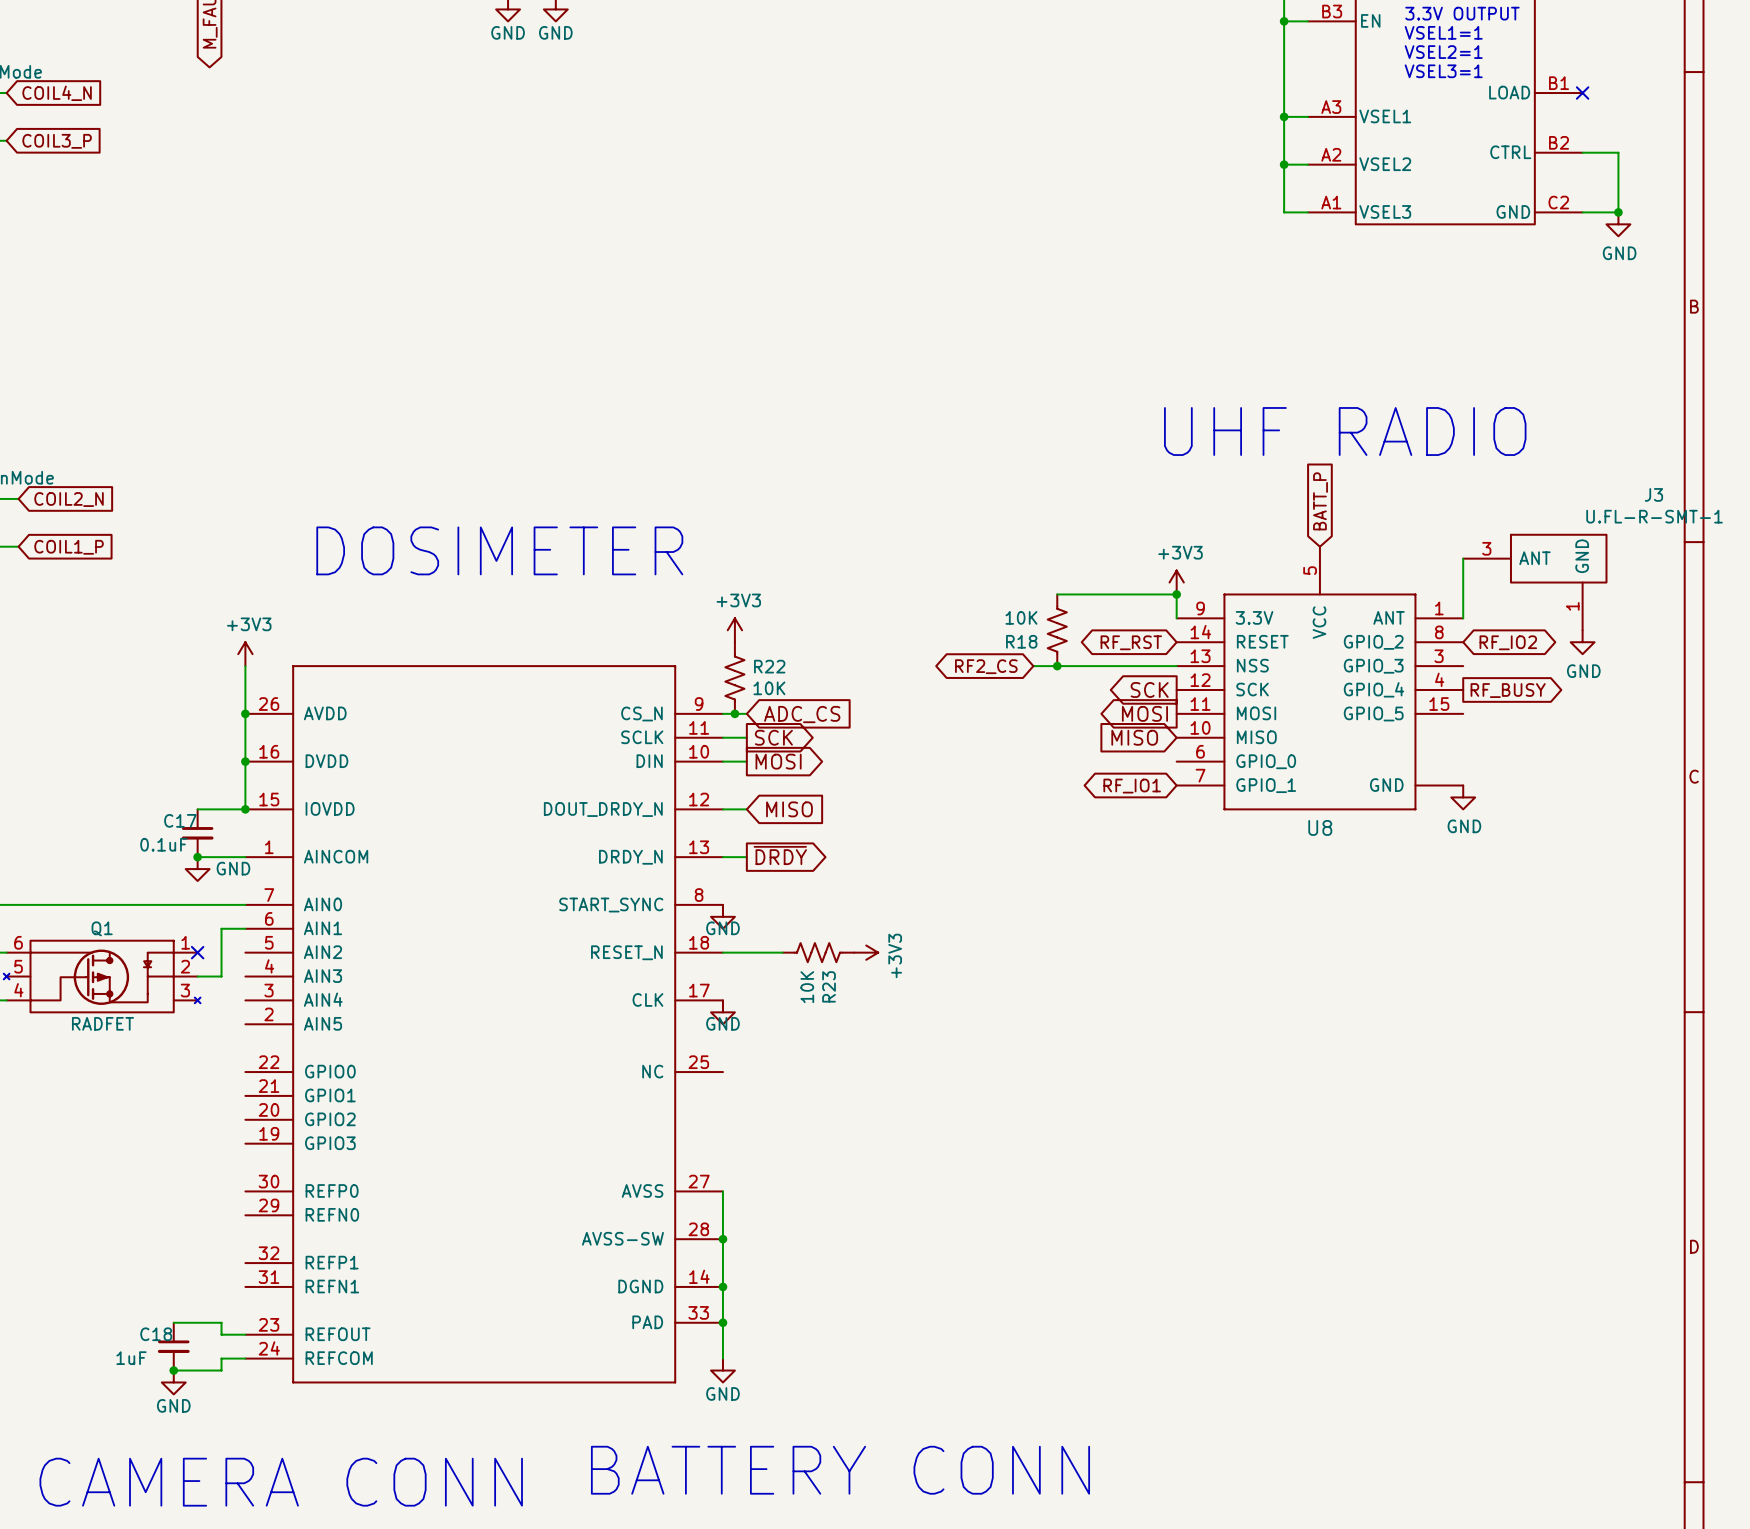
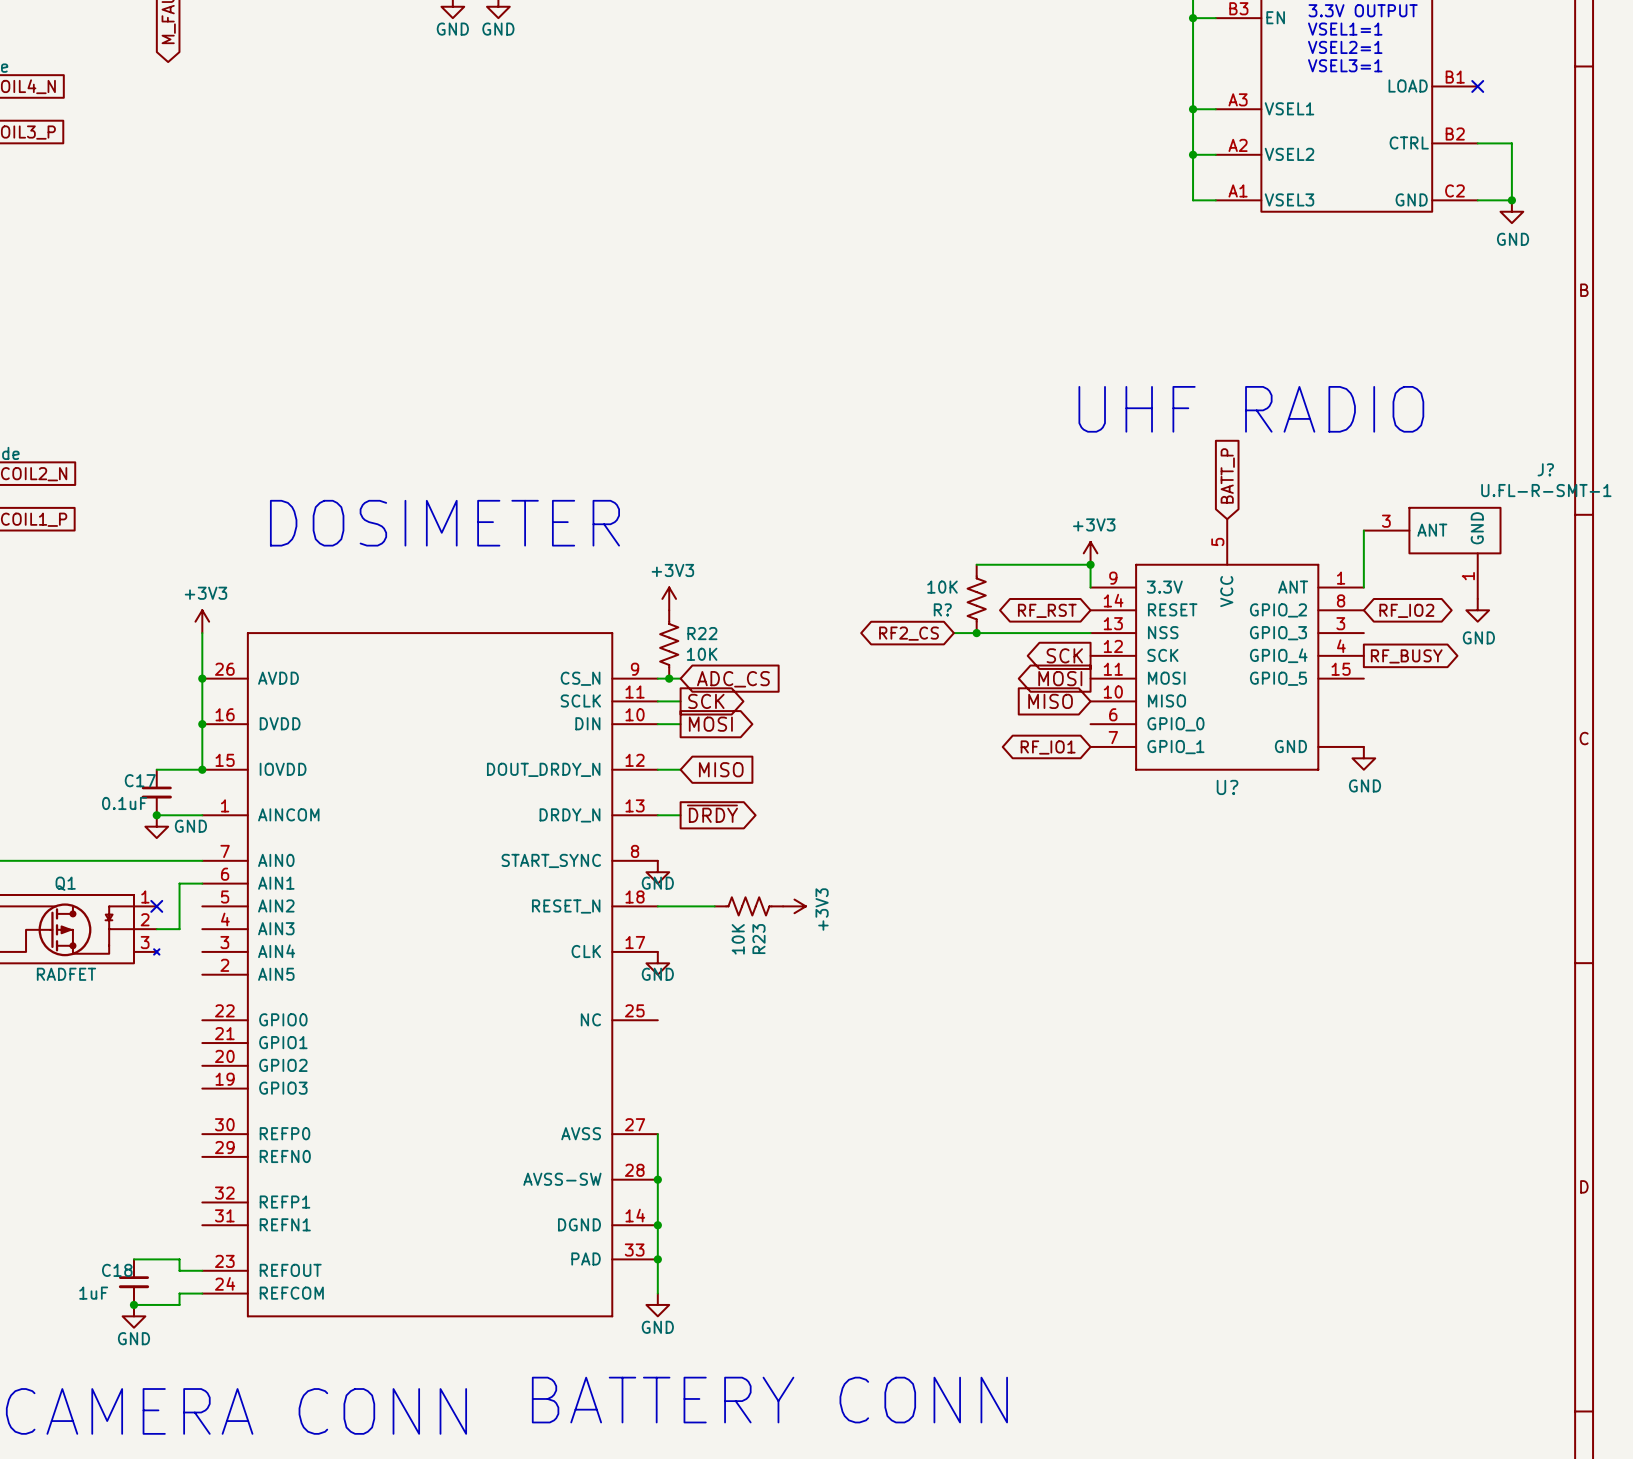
J3 name: J3 (1653, 494) -> J? (1545, 469)
R18 name: R18 (1021, 641) -> R? (942, 609)
U8 name: U8 (1320, 827) -> U? (1227, 787)

